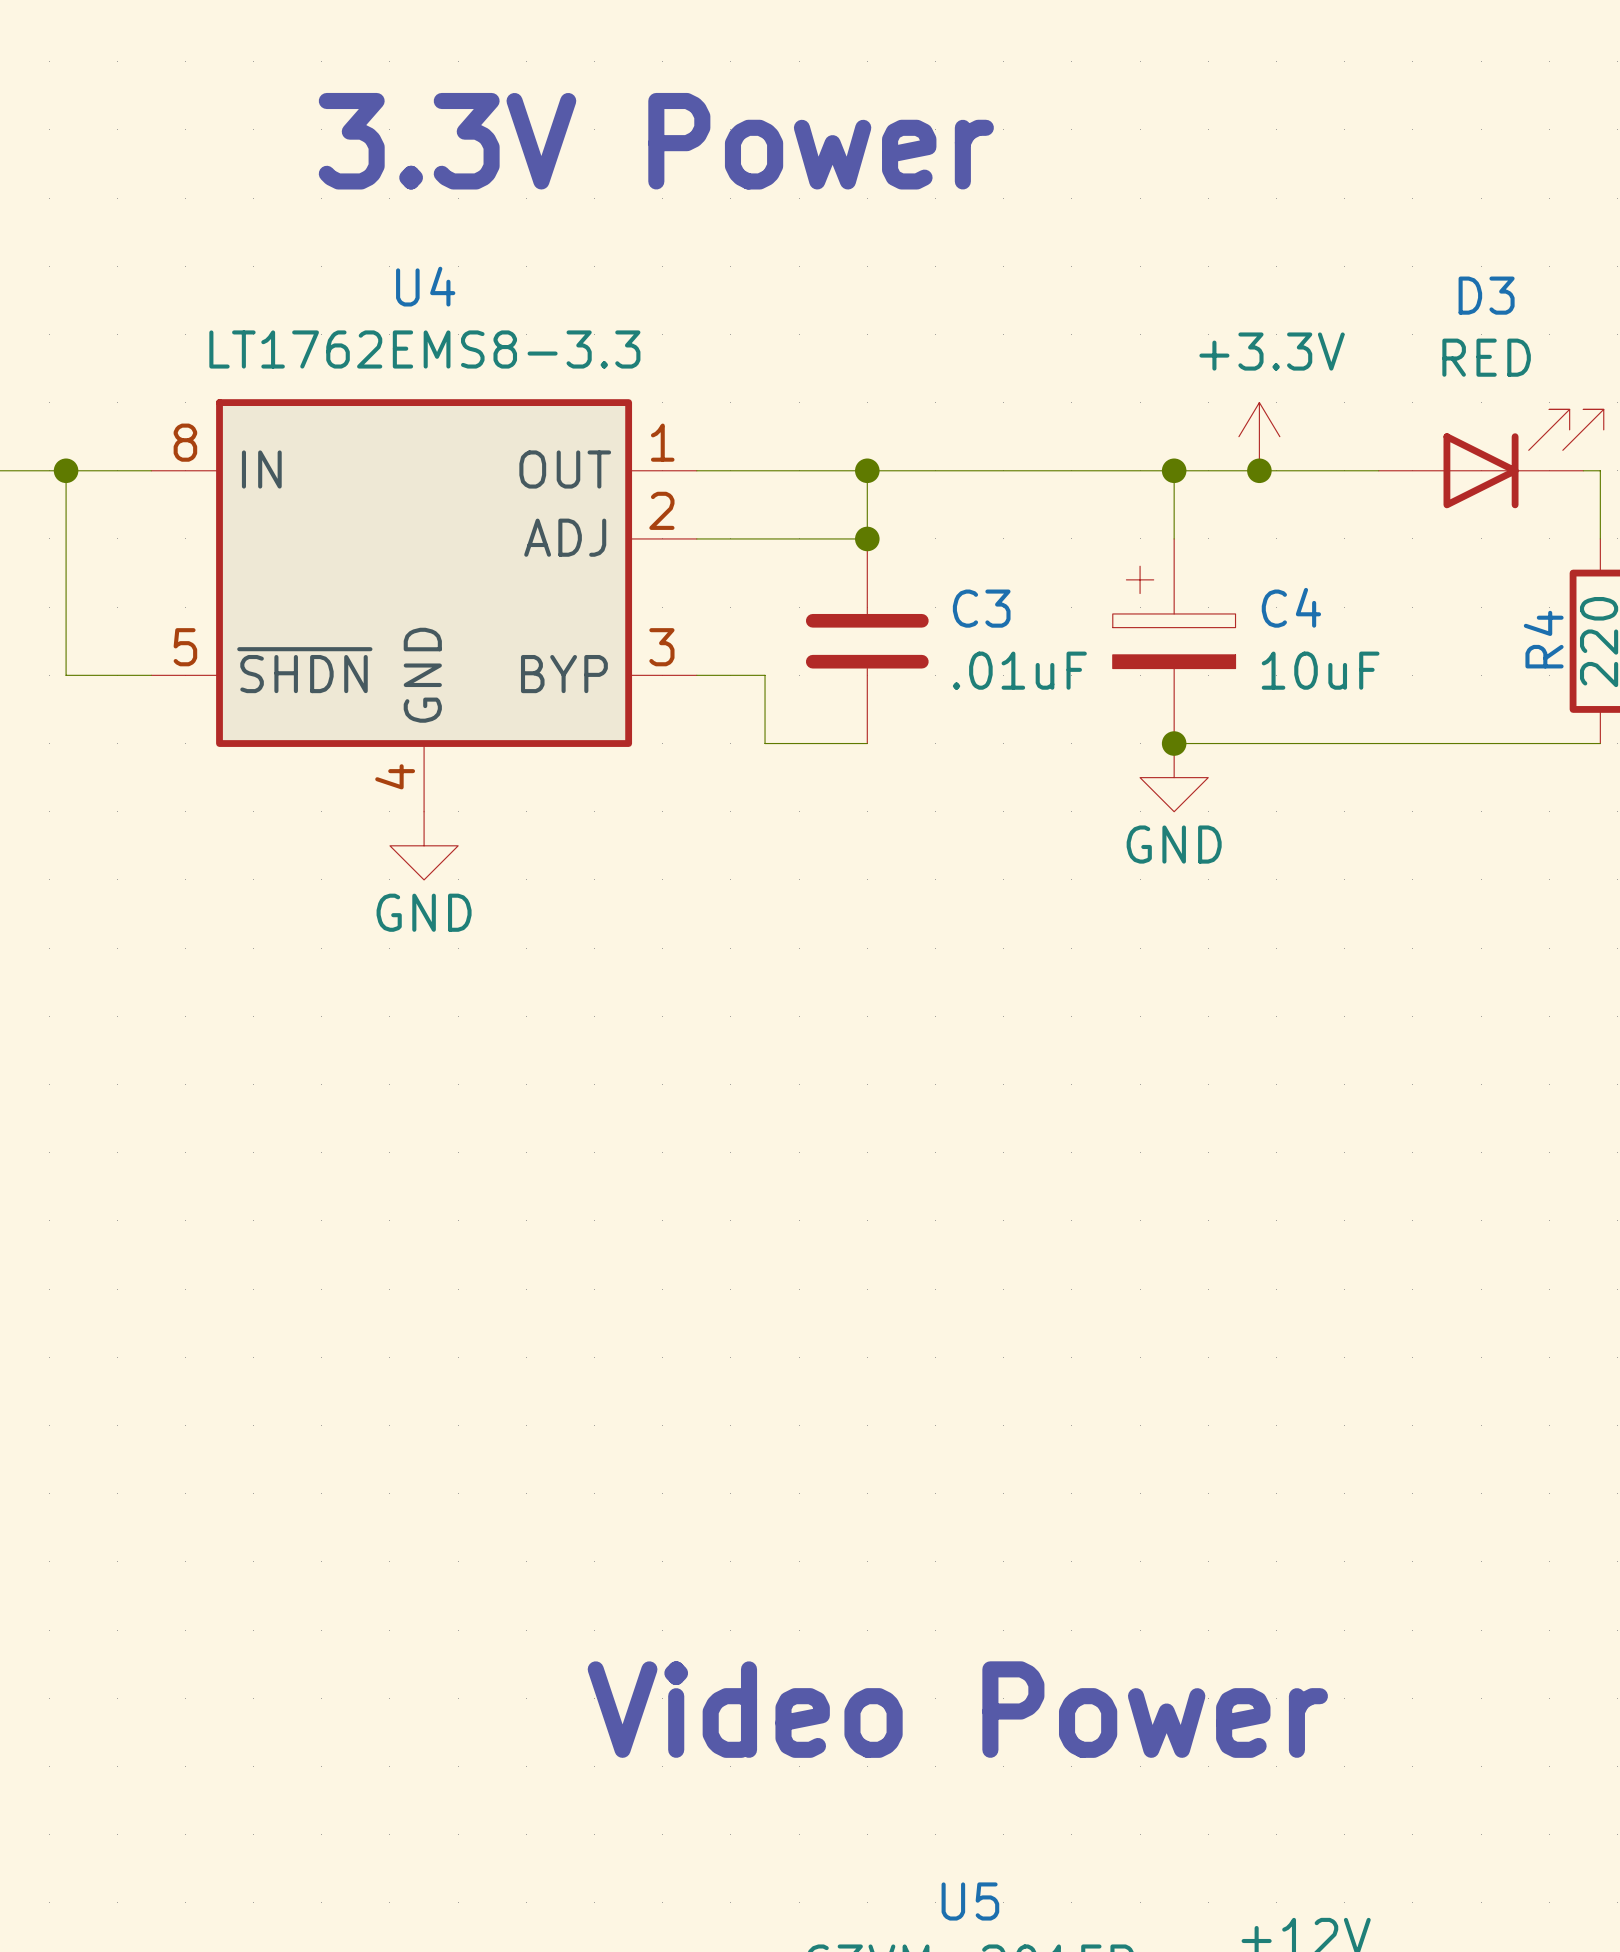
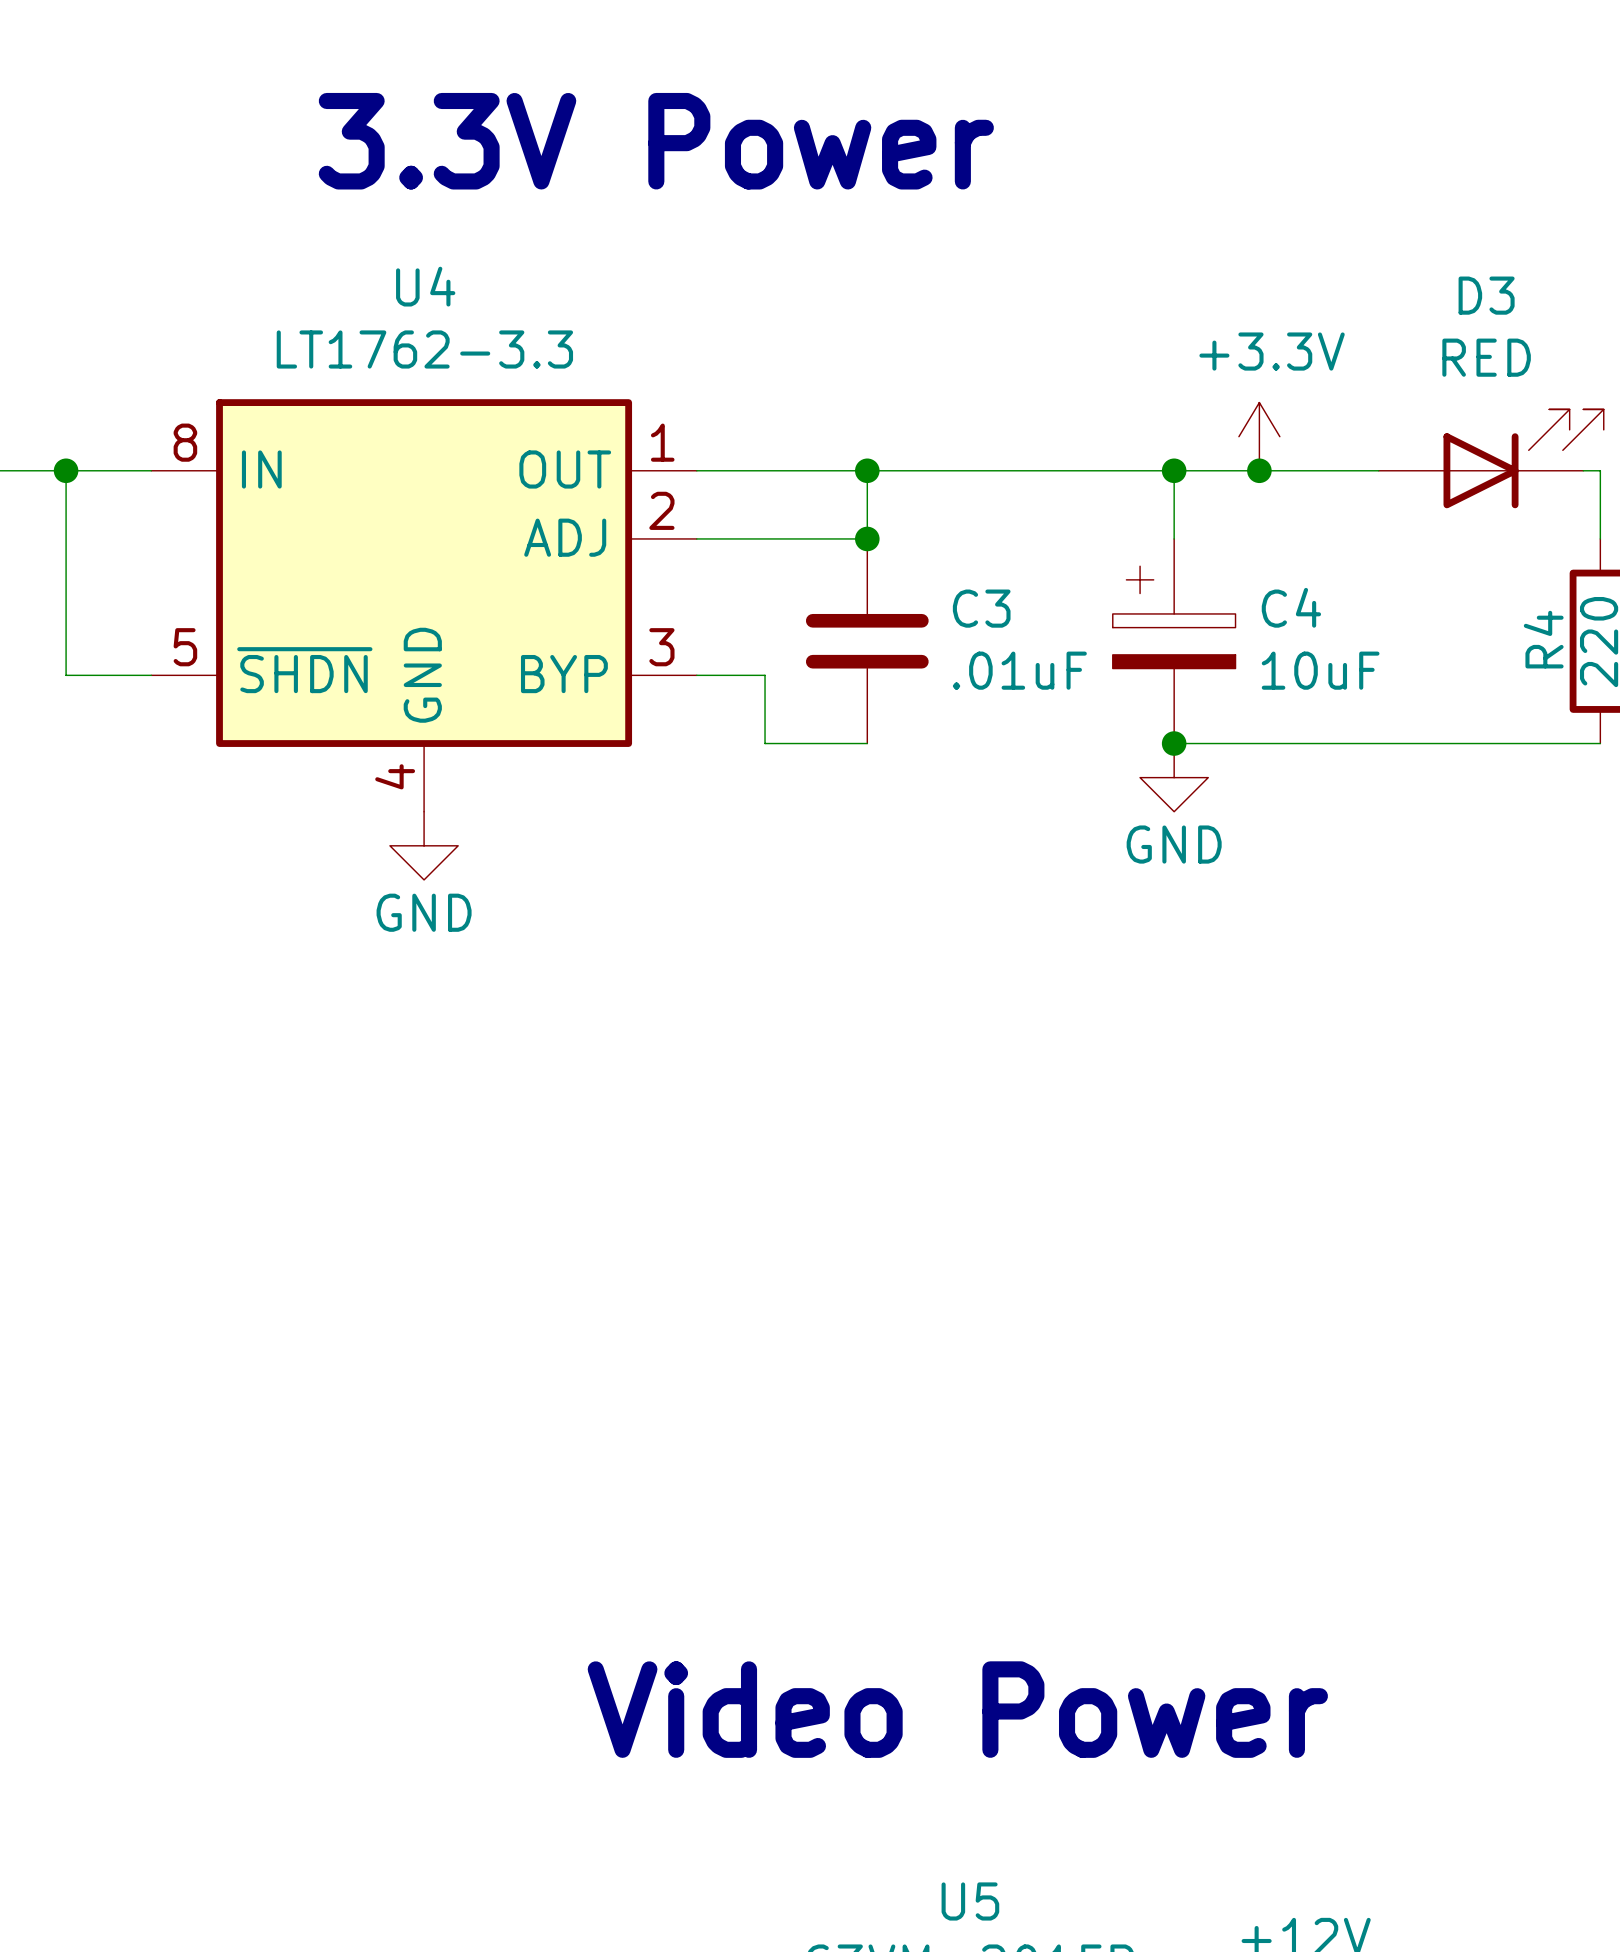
U4 value: LT1762EMS8-3.3 (424, 349) -> LT1762-3.3 (424, 349)

